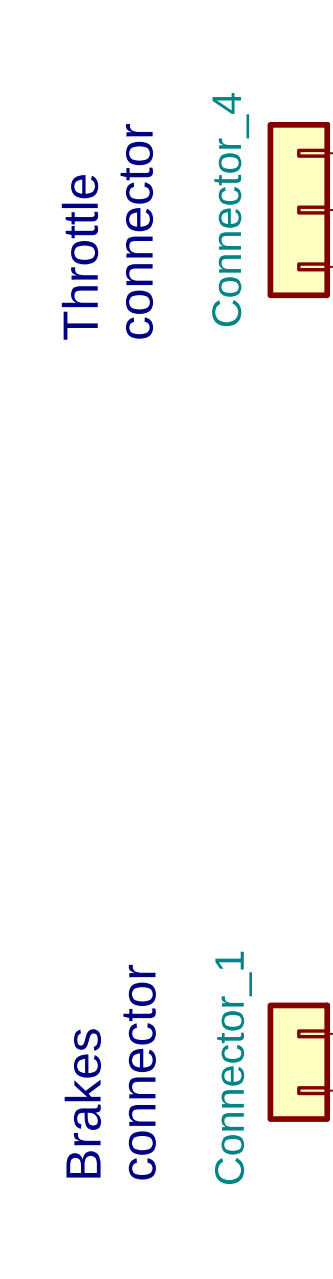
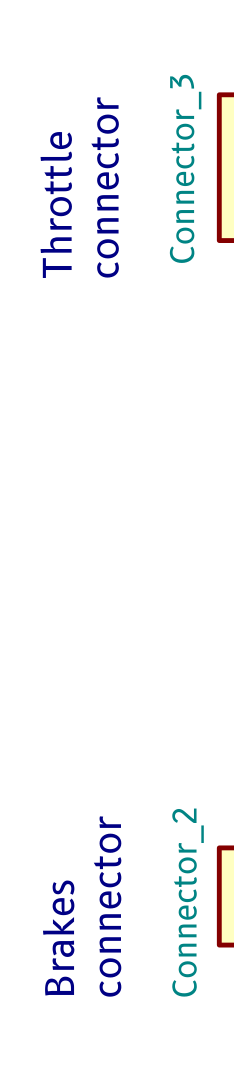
part value: Connector_4 (230, 209) -> Connector_3 (185, 168)
Connector_1 name: Connector_1 (233, 1067) -> Connector_2 (188, 902)

